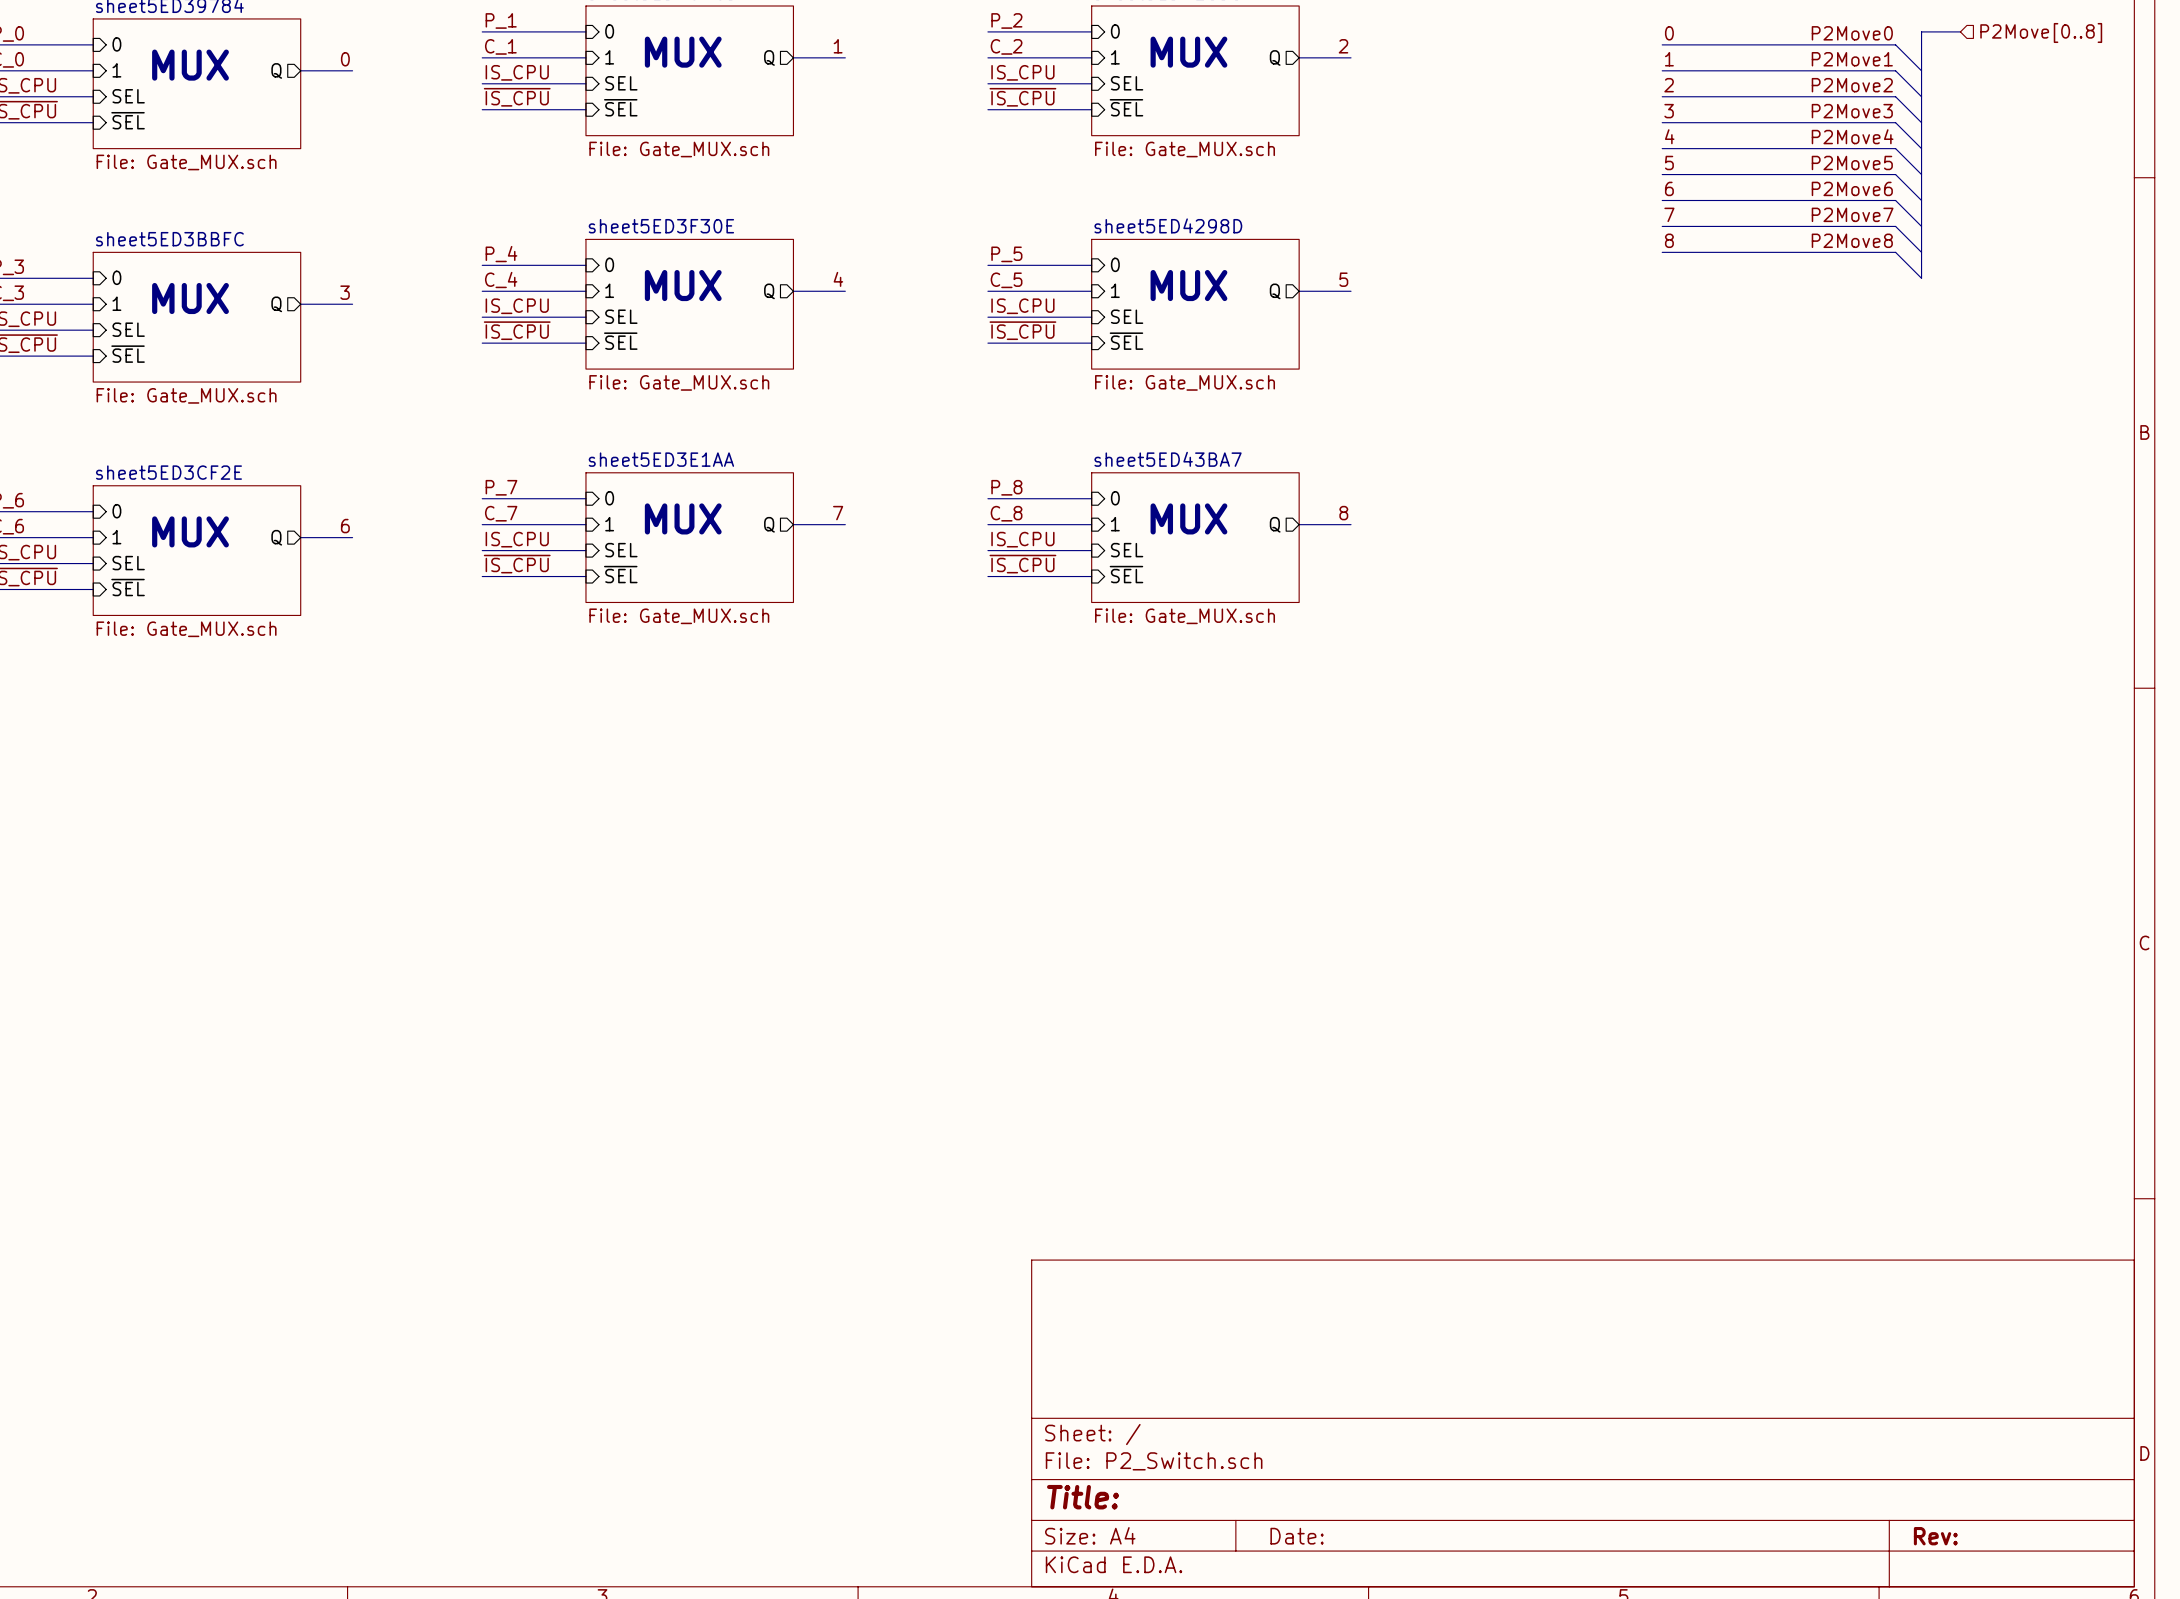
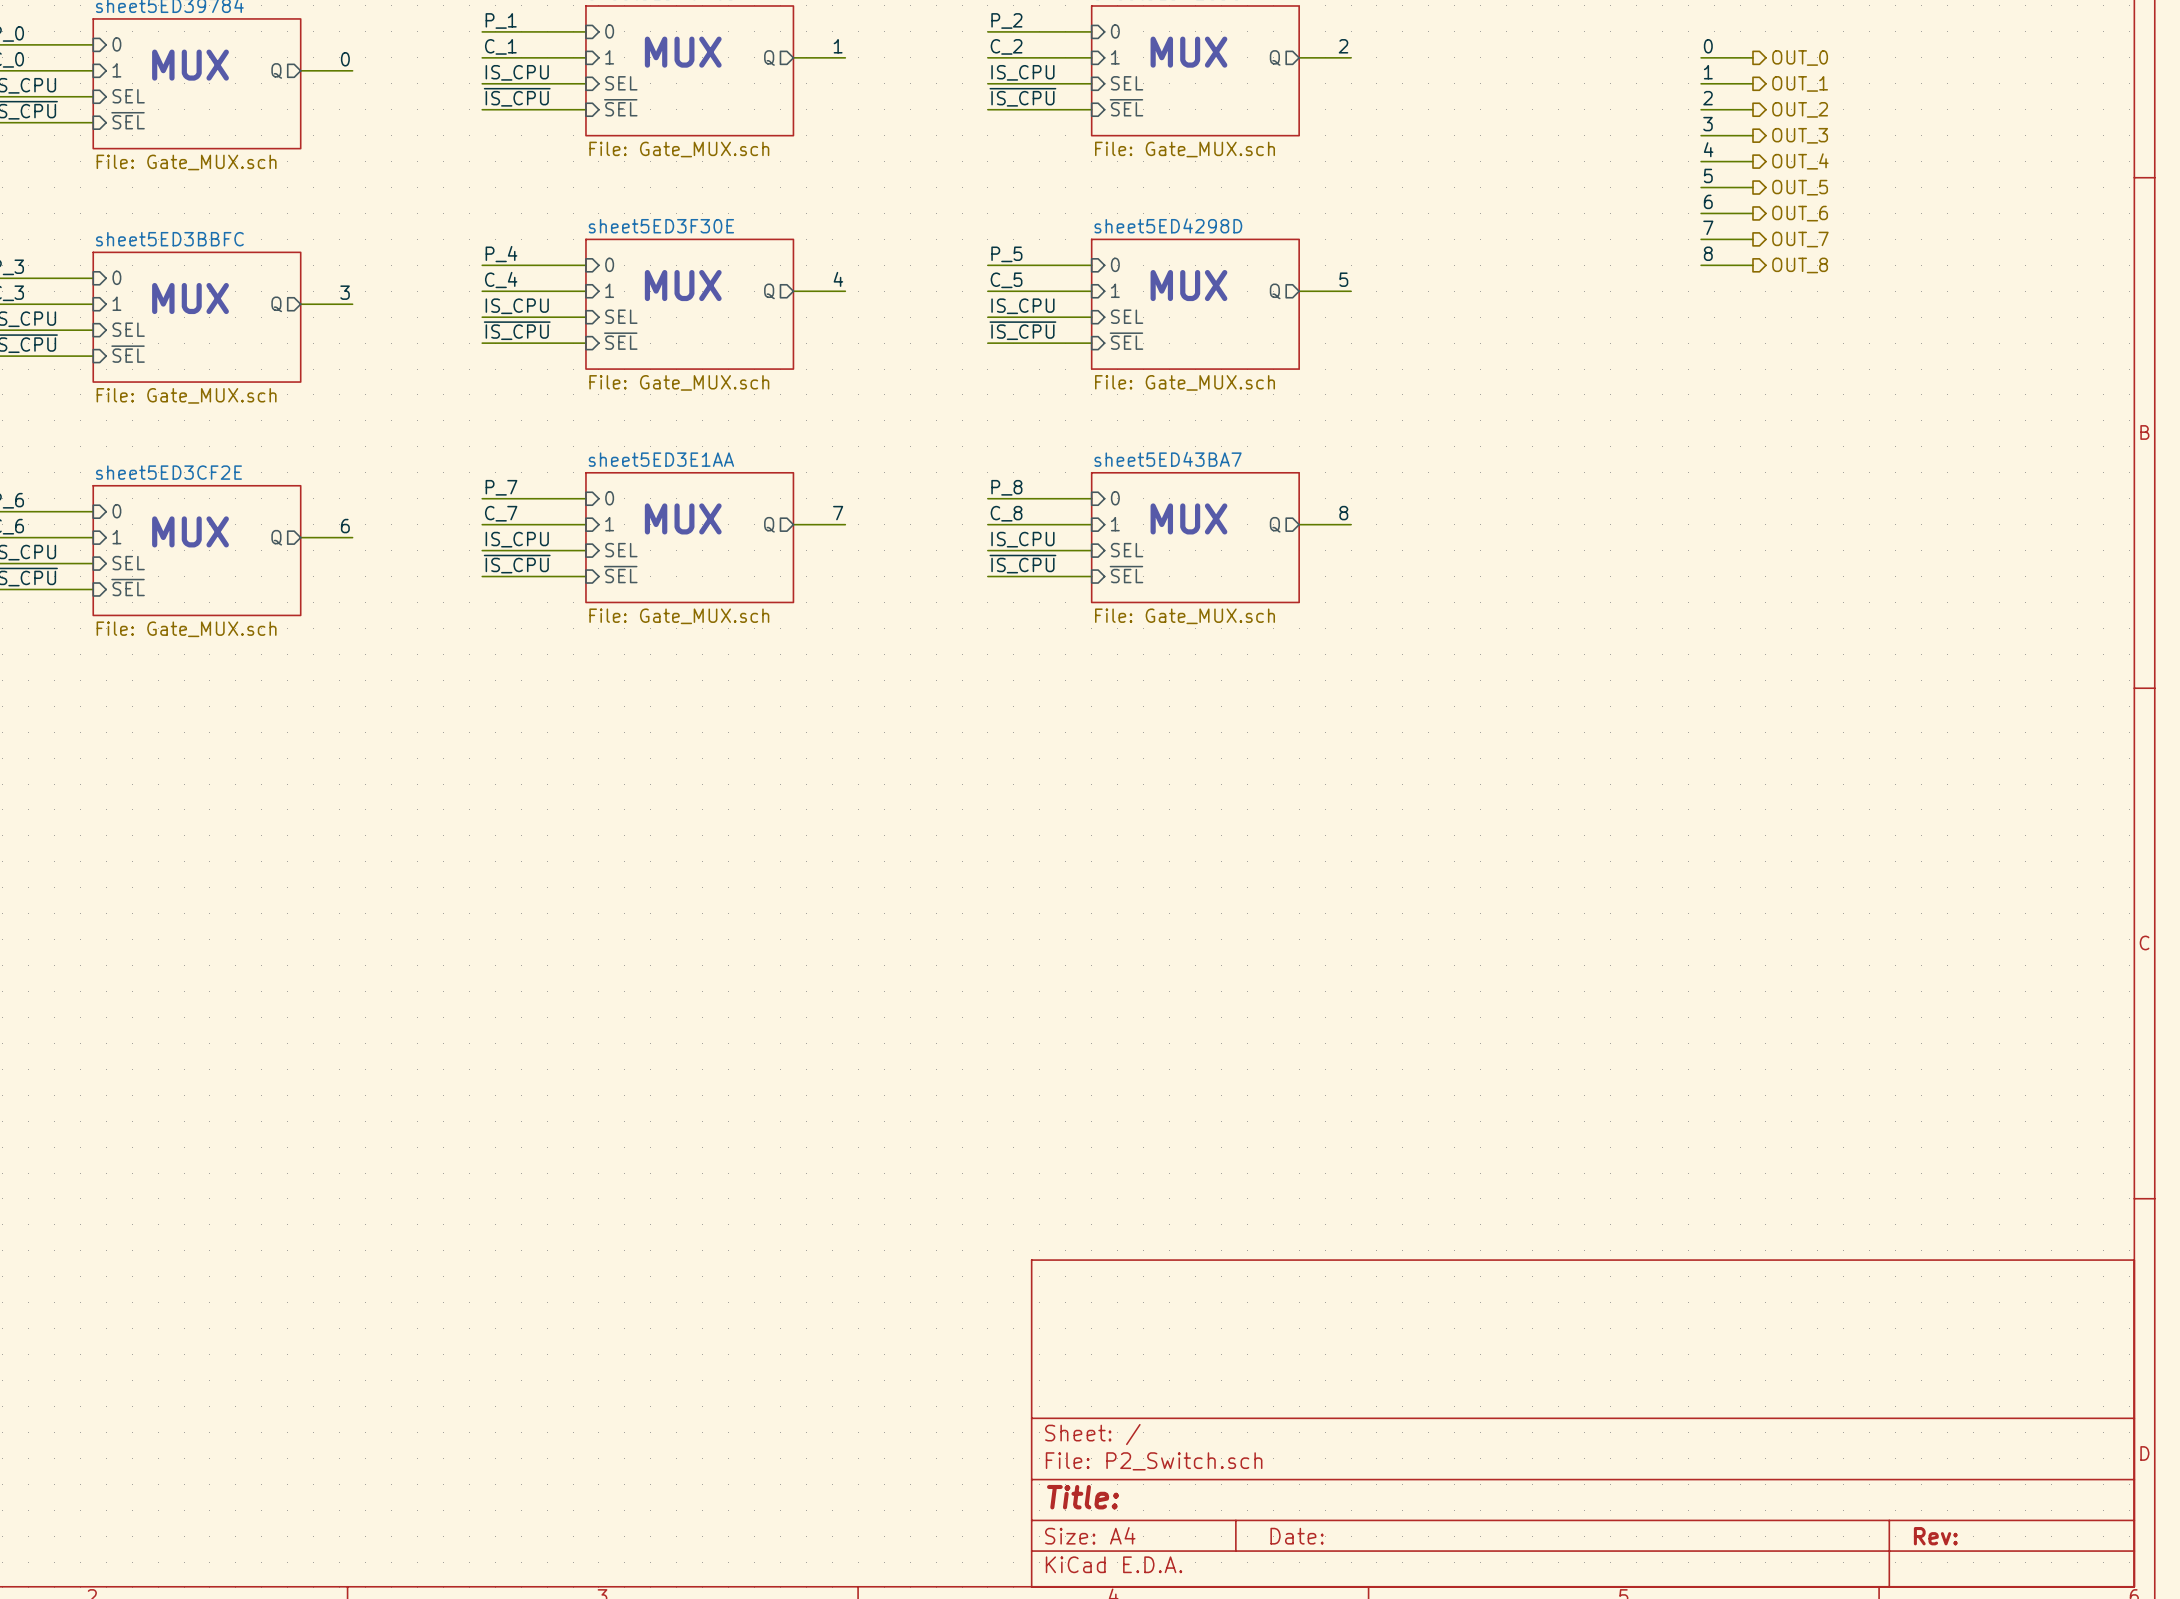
bus: (1960, 31) (1921, 31) (1921, 278) -> none
hierarchical label: P2Move[0..8] (2041, 32) -> none
label position: 0 (1669, 33) -> 0 (1708, 46)
label: P2Move0 (1852, 33) -> none
wire: (1662, 44) (1895, 44) (1921, 70) -> none
wire: none -> (1701, 57) (1752, 57)
hierarchical label: none -> OUT_0 (1800, 57)
label position: 1 (1669, 59) -> 1 (1708, 72)
label: P2Move1 (1852, 59) -> none
wire: (1662, 70) (1895, 70) (1921, 96) -> none
wire: none -> (1701, 83) (1752, 83)
hierarchical label: none -> OUT_1 (1800, 83)
label position: 2 (1669, 85) -> 2 (1708, 98)
label: P2Move2 (1852, 85) -> none
wire: (1662, 96) (1895, 96) (1921, 122) -> none
wire: none -> (1701, 109) (1752, 109)
hierarchical label: none -> OUT_2 (1800, 109)
label position: 3 (1669, 111) -> 3 (1708, 124)
label: P2Move3 (1852, 111) -> none
wire: (1662, 122) (1895, 122) (1921, 148) -> none
wire: none -> (1701, 135) (1752, 135)
hierarchical label: none -> OUT_3 (1800, 135)
label position: 4 (1669, 136) -> 4 (1708, 149)
label: P2Move4 (1852, 136) -> none
wire: (1662, 148) (1895, 148) (1921, 174) -> none
wire: none -> (1701, 161) (1752, 161)
hierarchical label: none -> OUT_4 (1800, 161)
label position: 5 (1669, 162) -> 5 (1708, 175)
label: P2Move5 (1852, 162) -> none
wire: (1662, 174) (1895, 174) (1921, 200) -> none
wire: none -> (1701, 187) (1752, 187)
hierarchical label: none -> OUT_5 (1800, 187)
label position: 6 (1669, 188) -> 6 (1708, 201)
label: P2Move6 (1852, 188) -> none
wire: (1662, 200) (1895, 200) (1921, 226) -> none
wire: none -> (1701, 213) (1752, 213)
hierarchical label: none -> OUT_6 (1800, 213)
label position: 7 (1669, 214) -> 7 (1708, 227)
label: P2Move7 (1852, 214) -> none
wire: (1662, 226) (1895, 226) (1921, 252) -> none
wire: none -> (1701, 239) (1752, 239)
hierarchical label: none -> OUT_7 (1800, 239)
label position: 8 (1669, 240) -> 8 (1708, 253)
label: P2Move8 (1852, 240) -> none
wire: (1662, 252) (1895, 252) (1921, 278) -> none
wire: none -> (1701, 265) (1752, 265)
hierarchical label: none -> OUT_8 (1800, 265)

